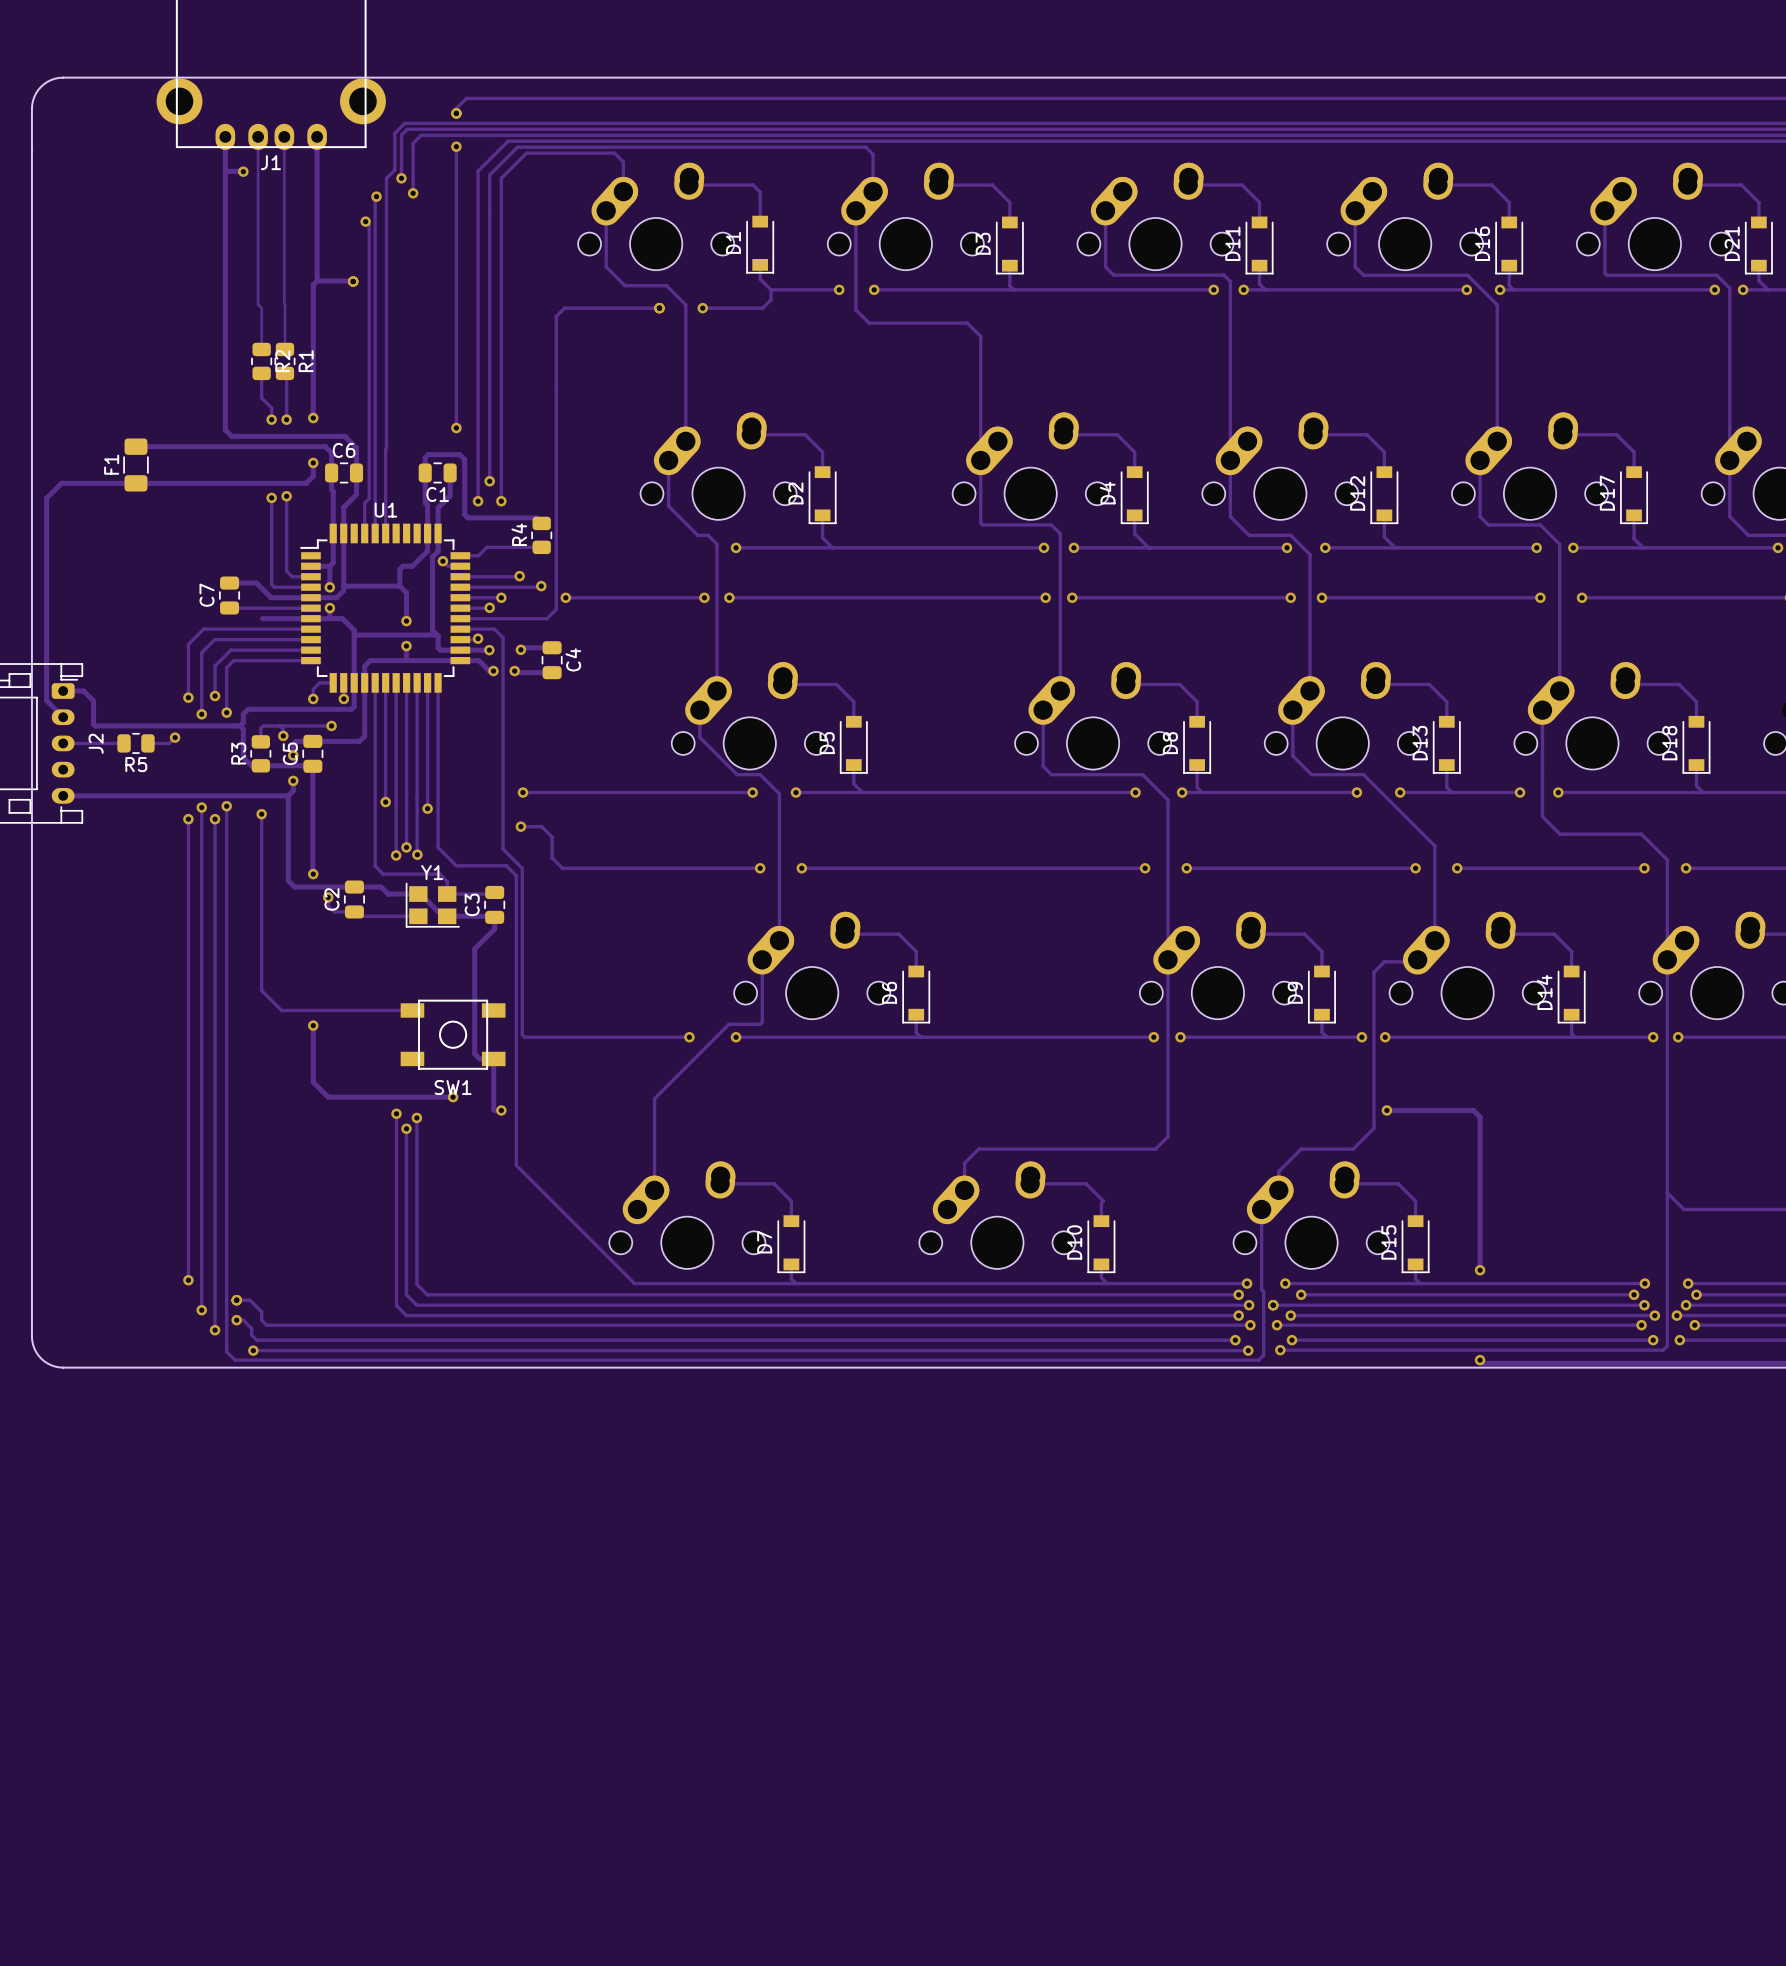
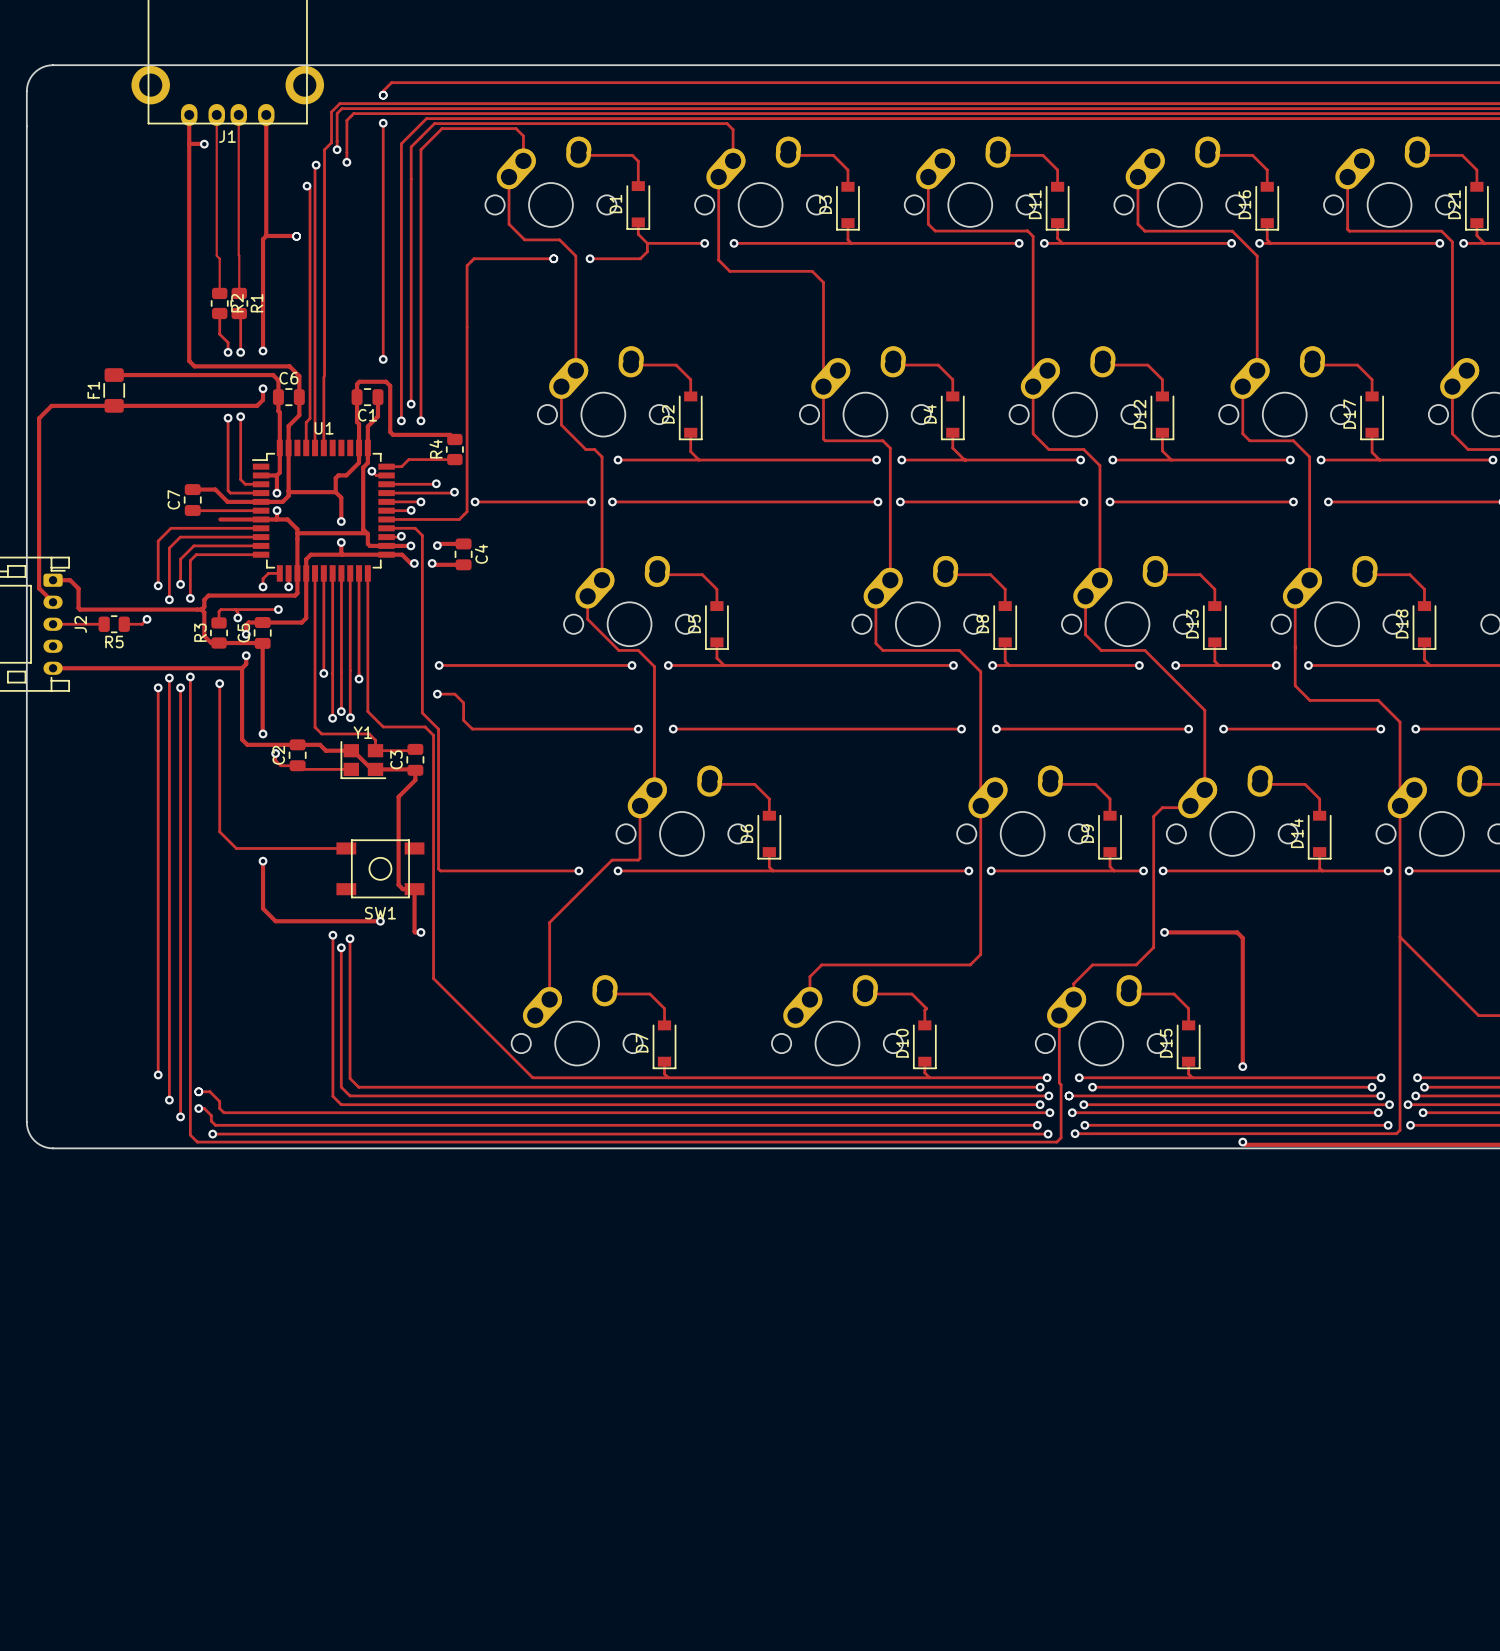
track: (1667, 1192) (1683, 1209) (1760, 1209) -> (1400, 936) (1478, 1015)

